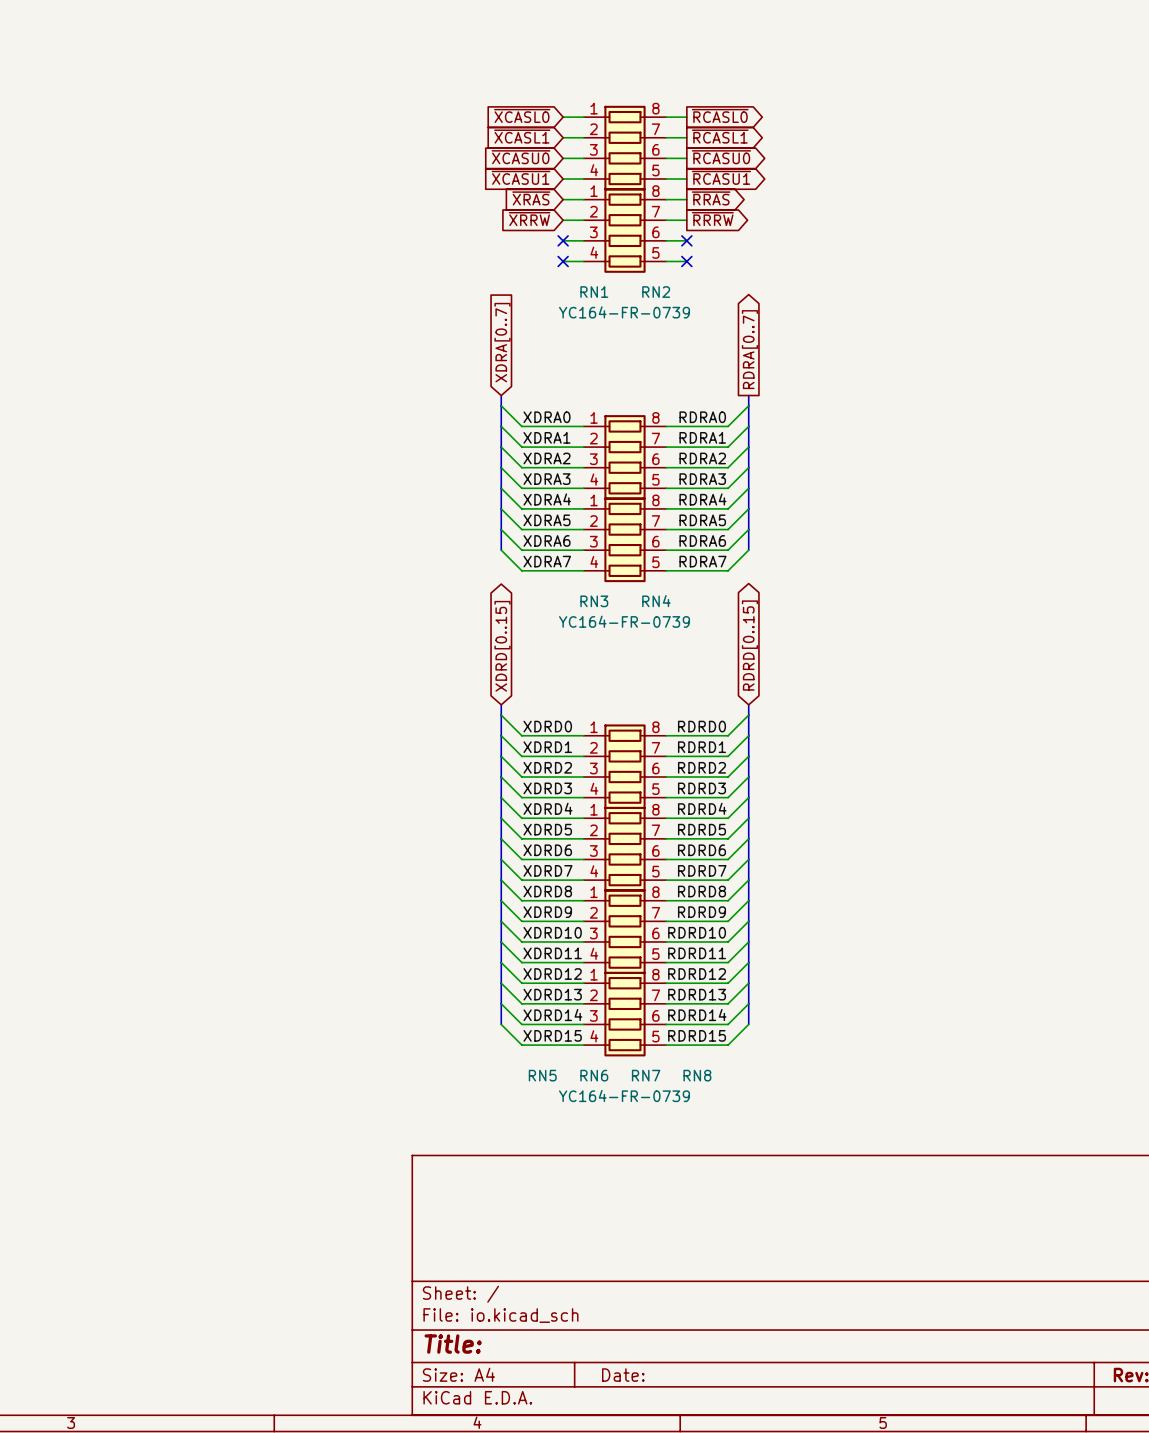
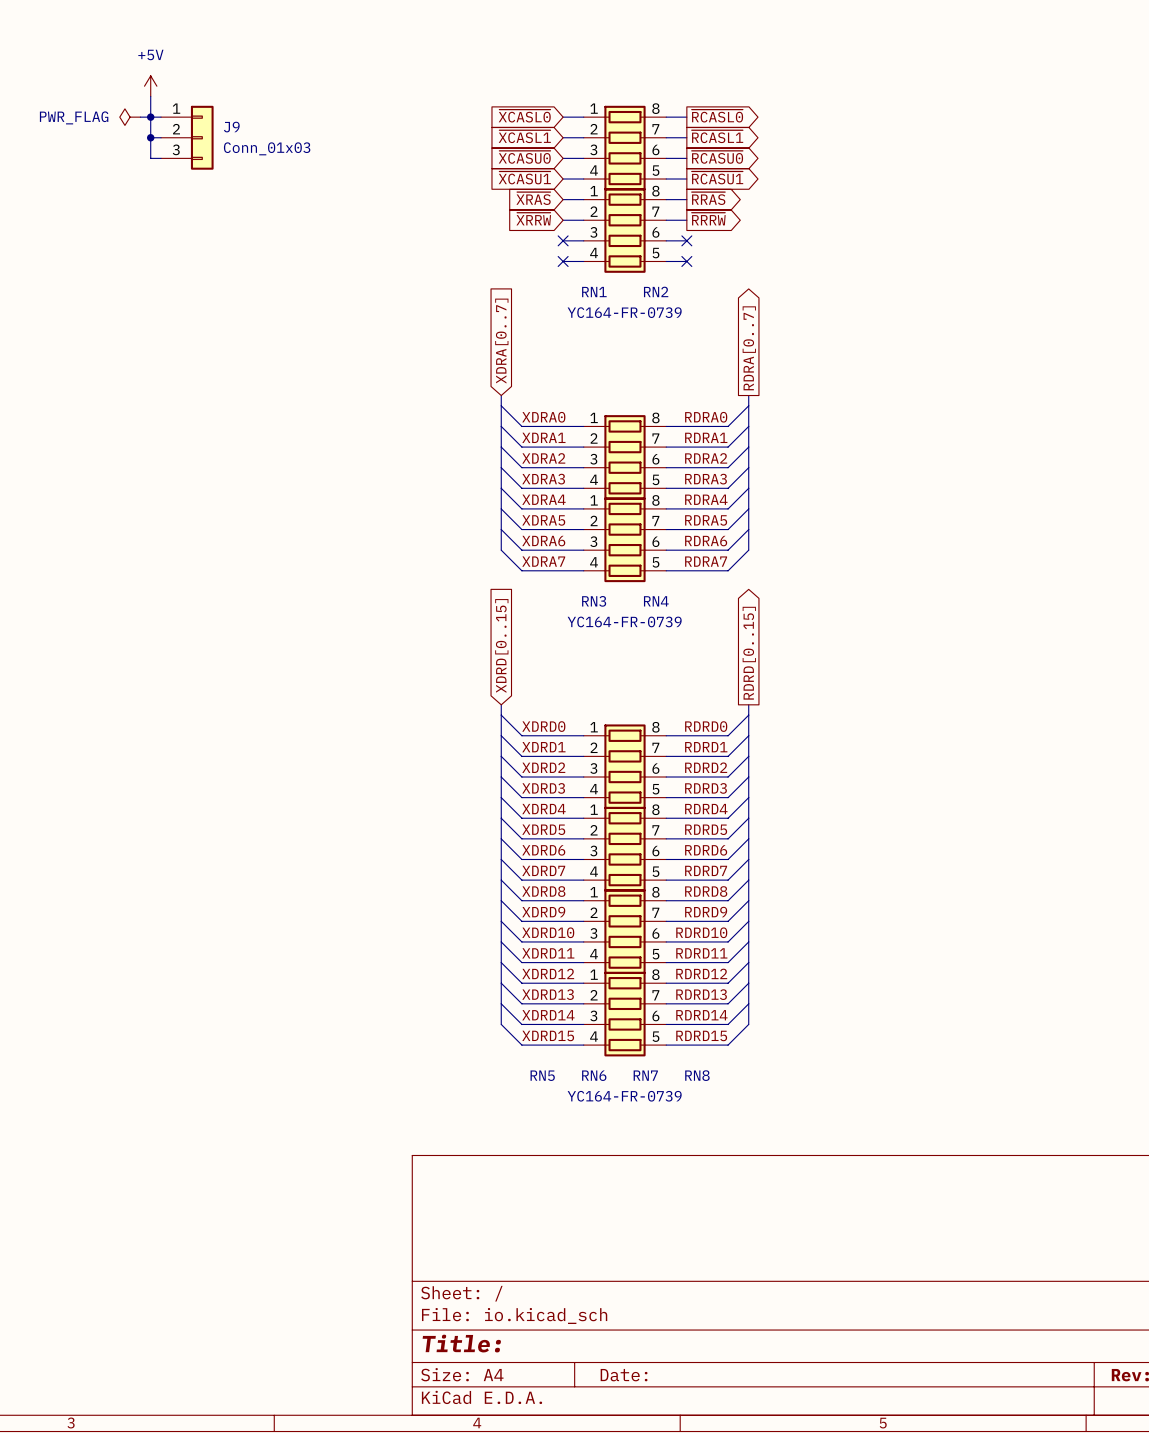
power symbol: none -> +5V (150, 86)
wire: none -> (150, 96) (150, 158) (161, 158)
power symbol: none -> PWR_FLAG (130, 117)
wire: none -> (140, 117) (161, 117)
junction: none -> (150, 117)
wire: none -> (150, 137) (161, 137)
junction: none -> (150, 137)
J9: none -> Conn_01x03 (187, 137)
global label shape: bidirectional (749, 645) -> output (749, 653)
global label shape: bidirectional (502, 646) -> input (501, 645)

